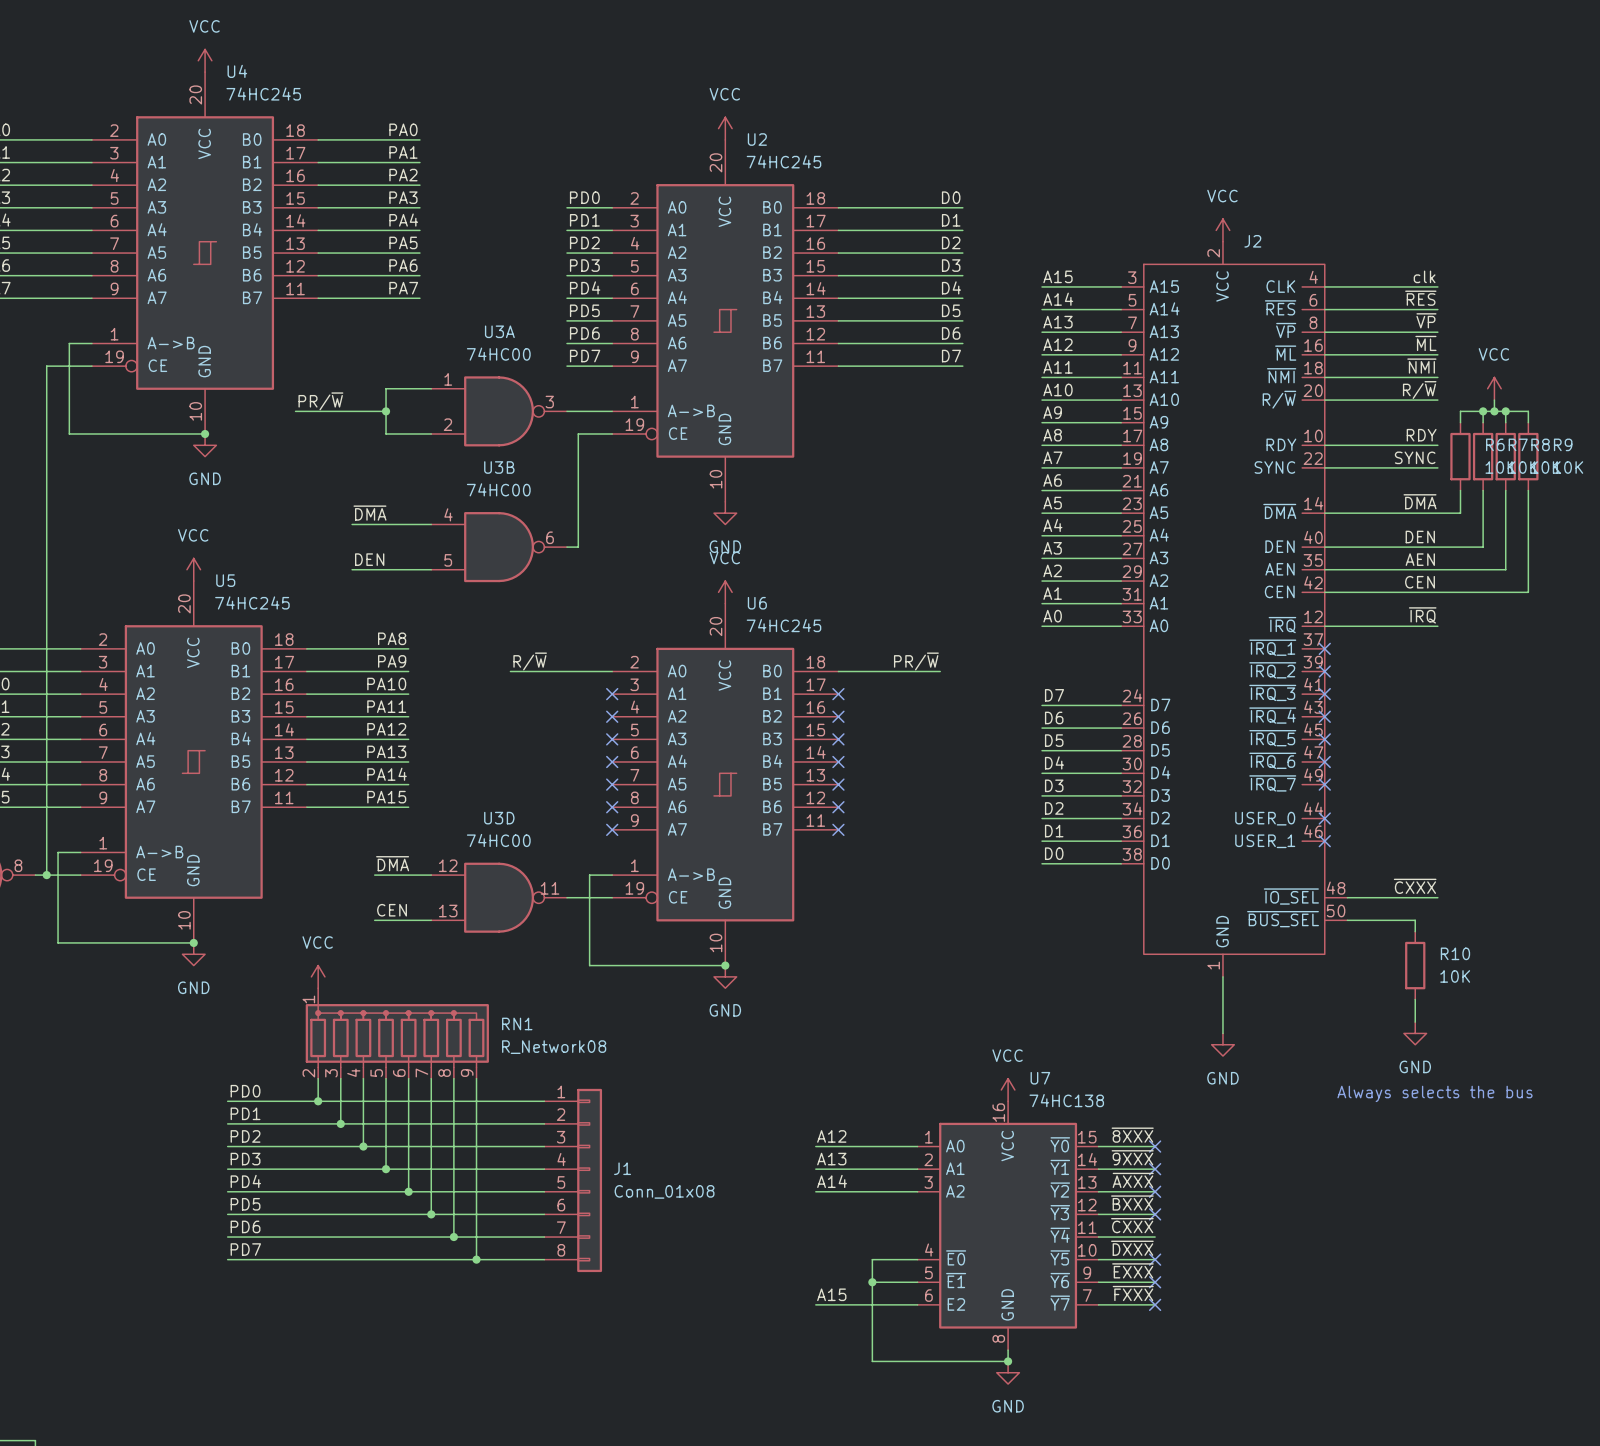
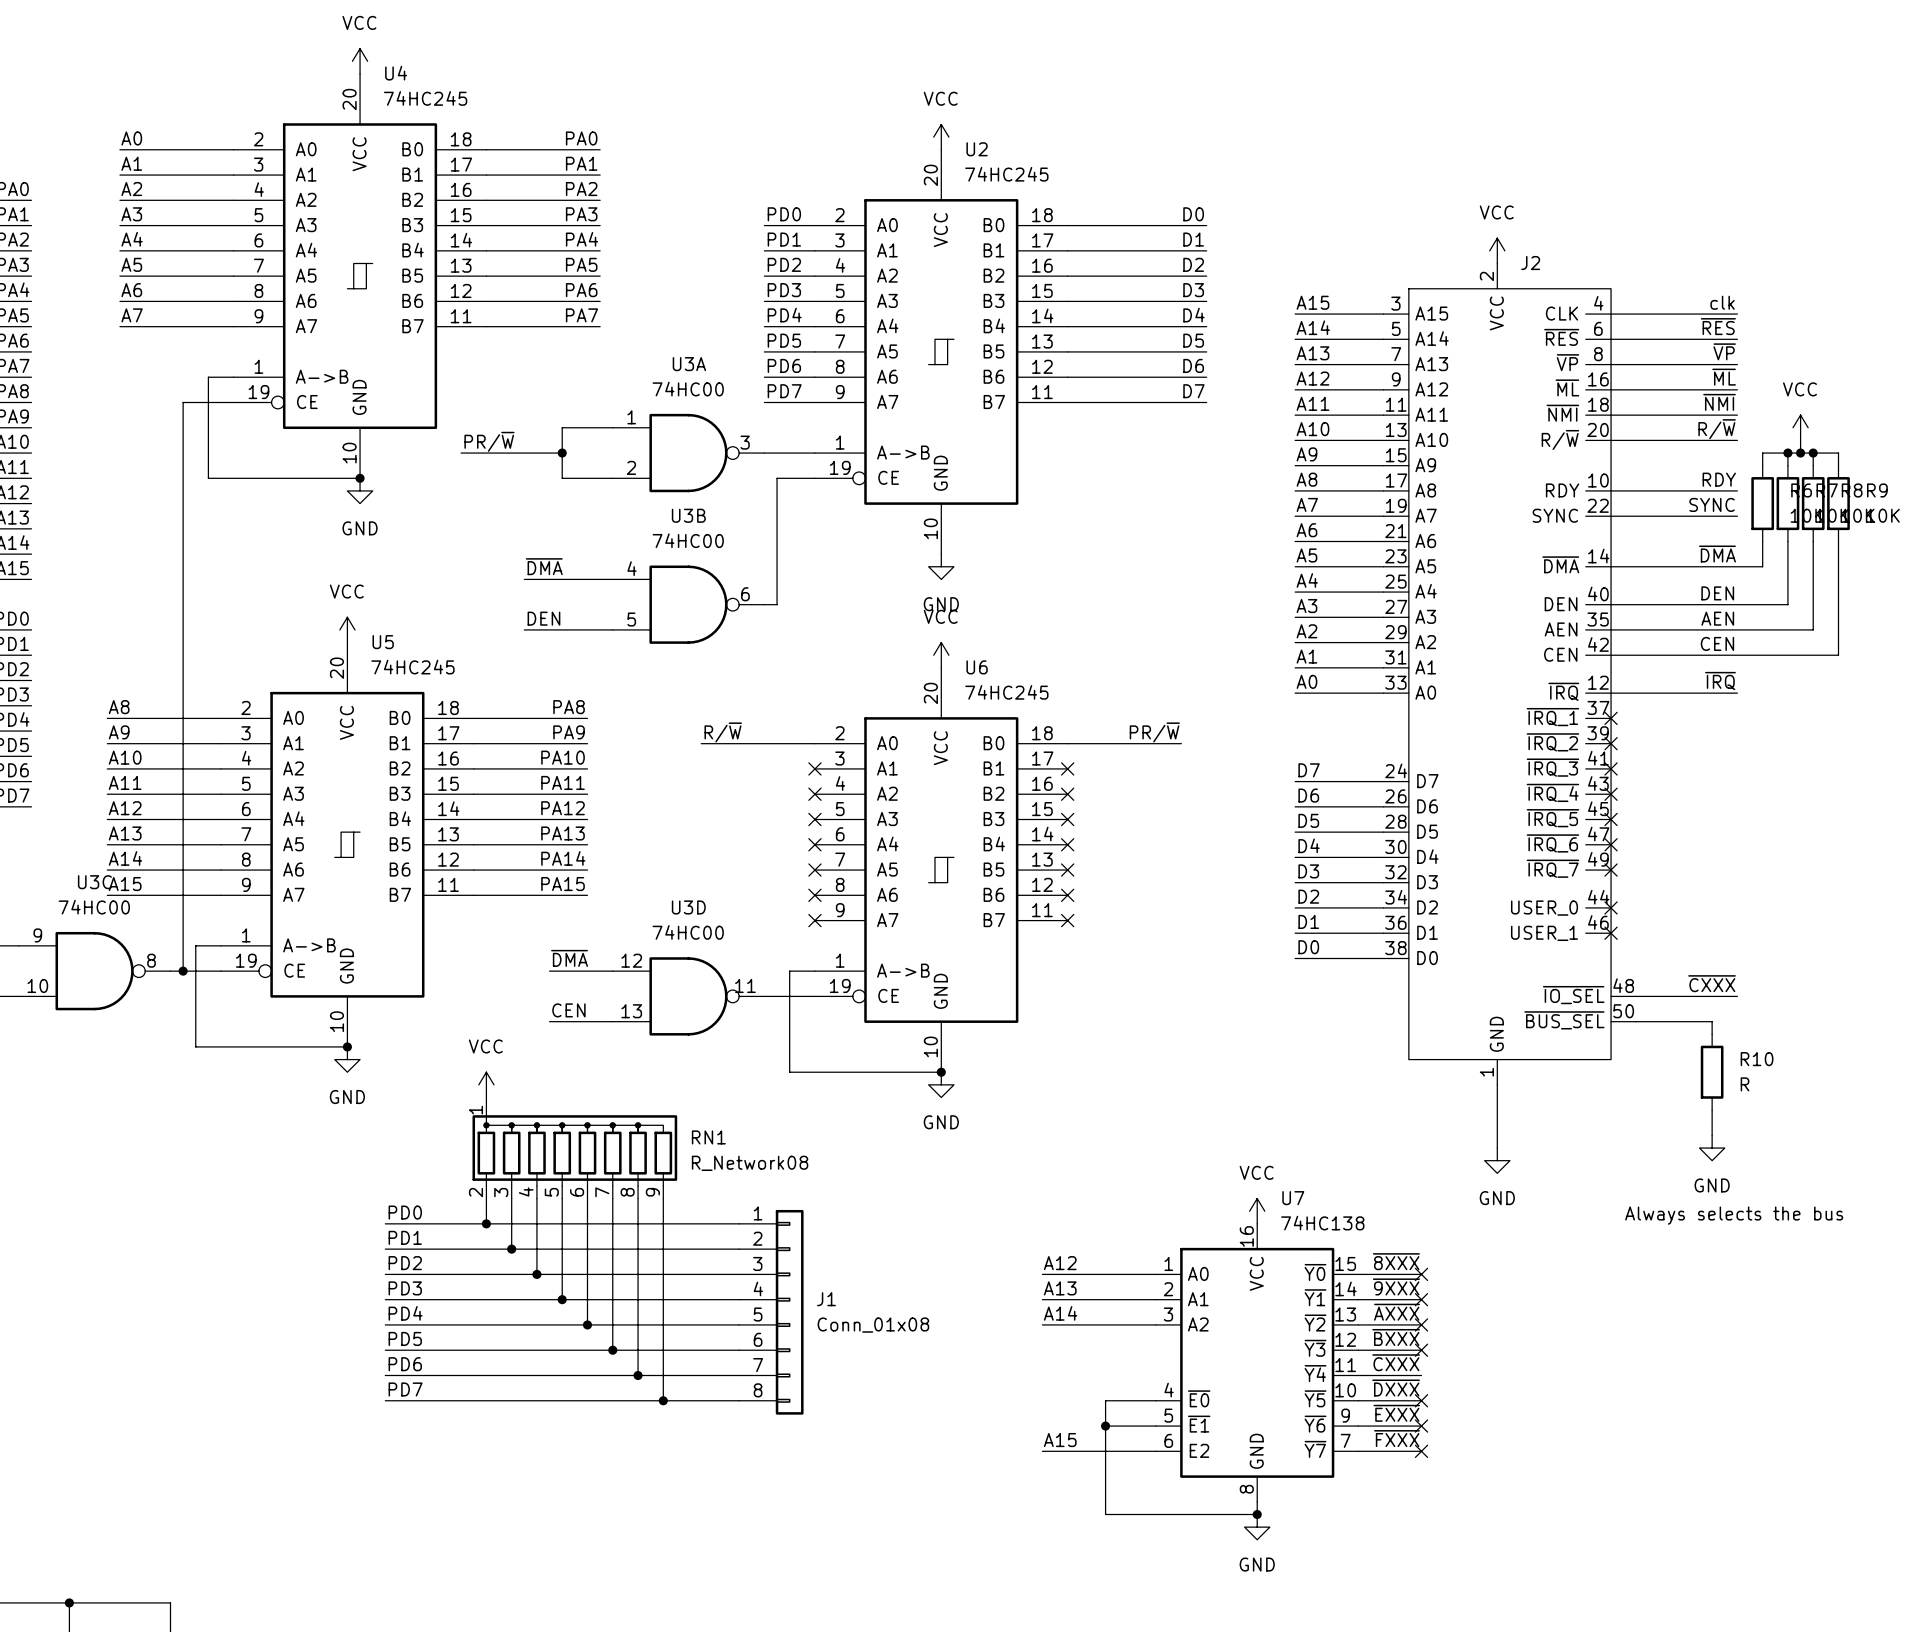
R10 value: 10K (1455, 976) -> R (1745, 1084)

